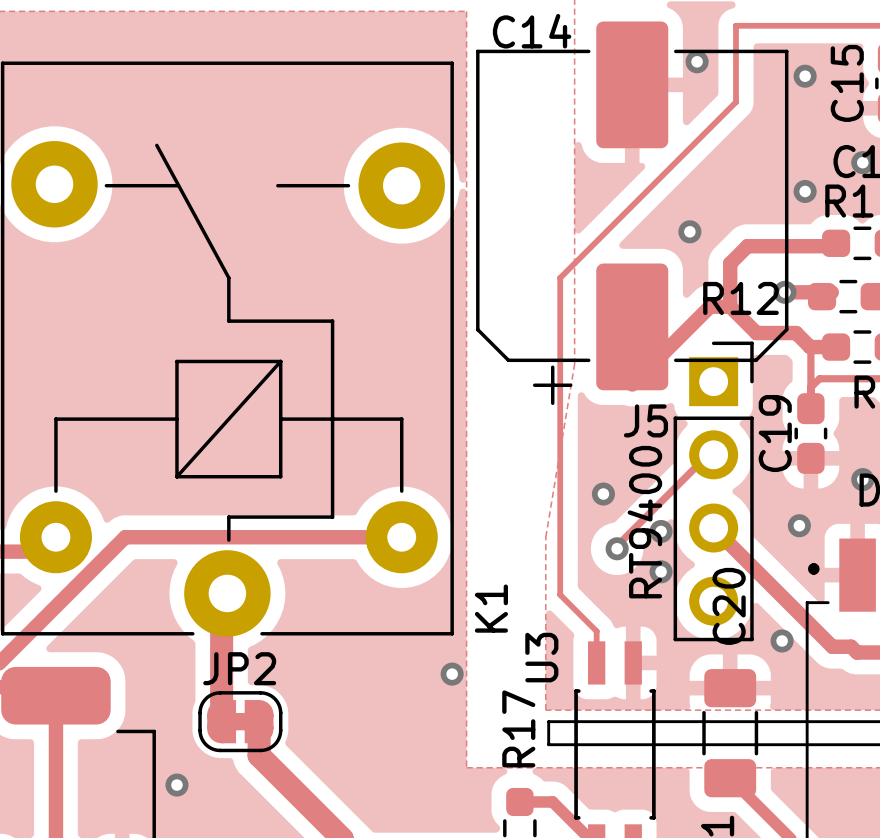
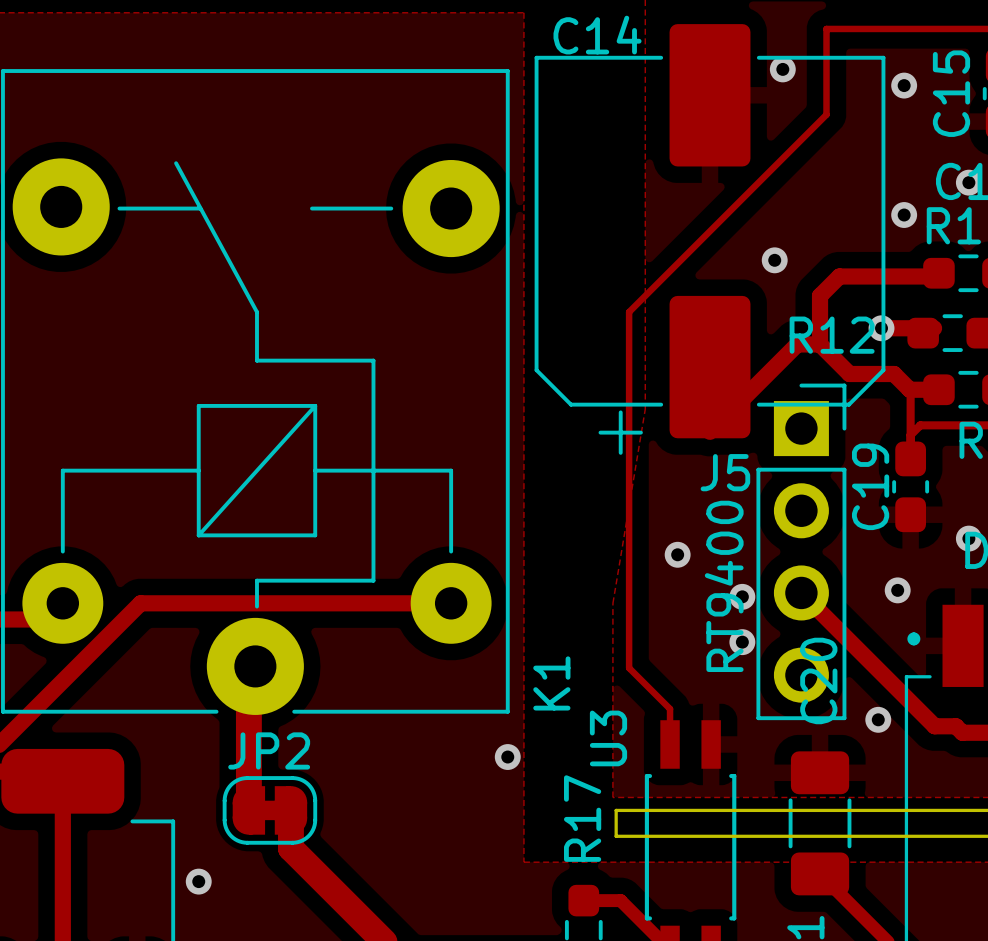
track: (713, 454) (708, 454) (617, 545) (617, 548) -> none
via: (617, 548) -> none

